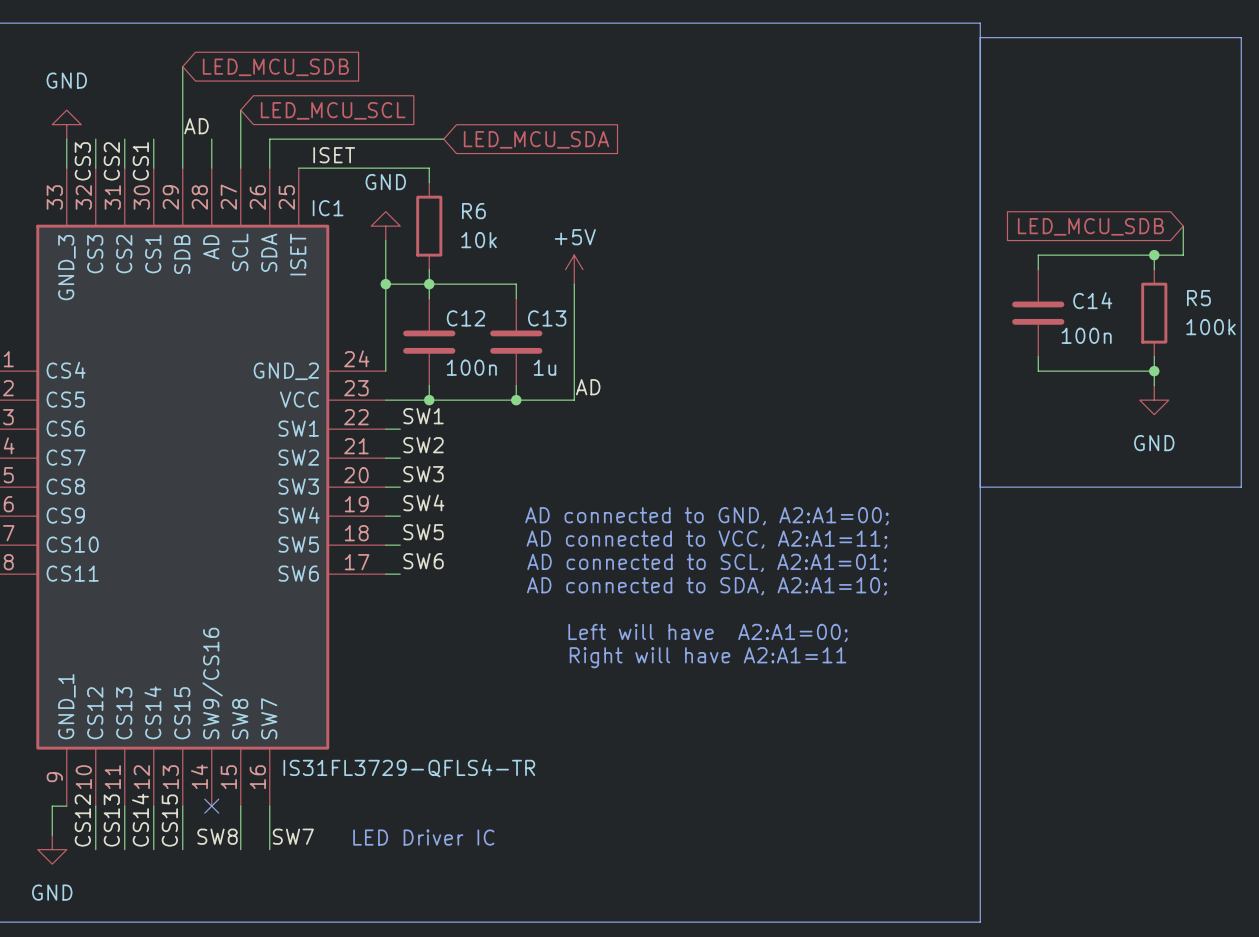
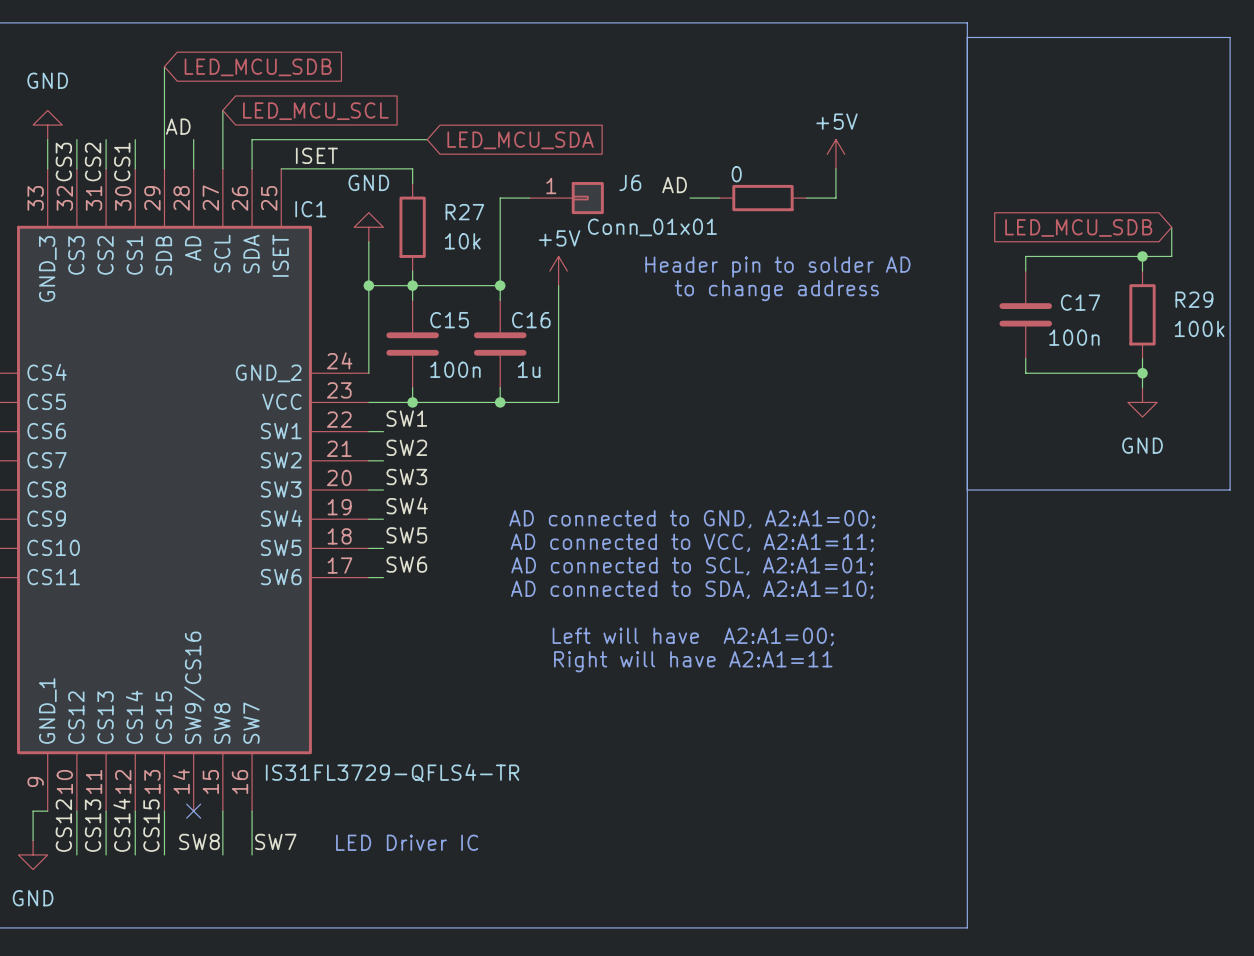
power symbol: none -> +5V (835, 154)
wire: none -> (835, 168) (835, 198) (806, 198)
wire: none -> (529, 198) (500, 198) (500, 285)
J6: none -> Conn_01x01 (566, 198)
wire: none -> (689, 198) (719, 198)
part: none -> 0 (762, 198)
R6 name: R6 (473, 211) -> R27 (464, 212)
text: none -> Header pin to solder AD (777, 267)
junction: none -> (500, 285)
text: none -> to change address (776, 290)
R5 name: R5 (1198, 298) -> R29 (1194, 299)
C14 name: C14 (1092, 300) -> C17 (1080, 302)
C12 name: C12 (465, 318) -> C15 (449, 320)
C13 name: C13 (547, 318) -> C16 (531, 320)
label position: AD (588, 387) -> AD (674, 185)

